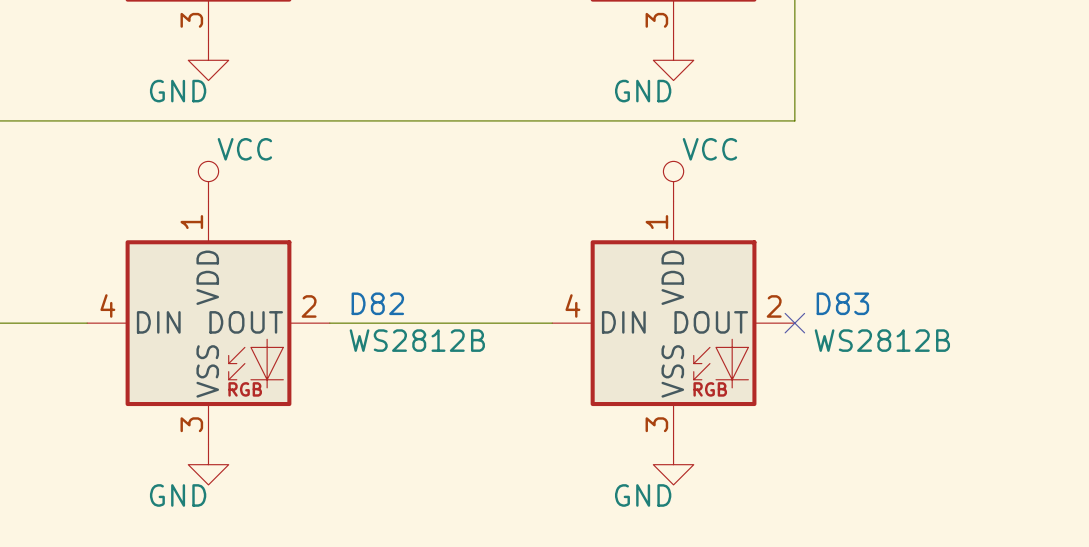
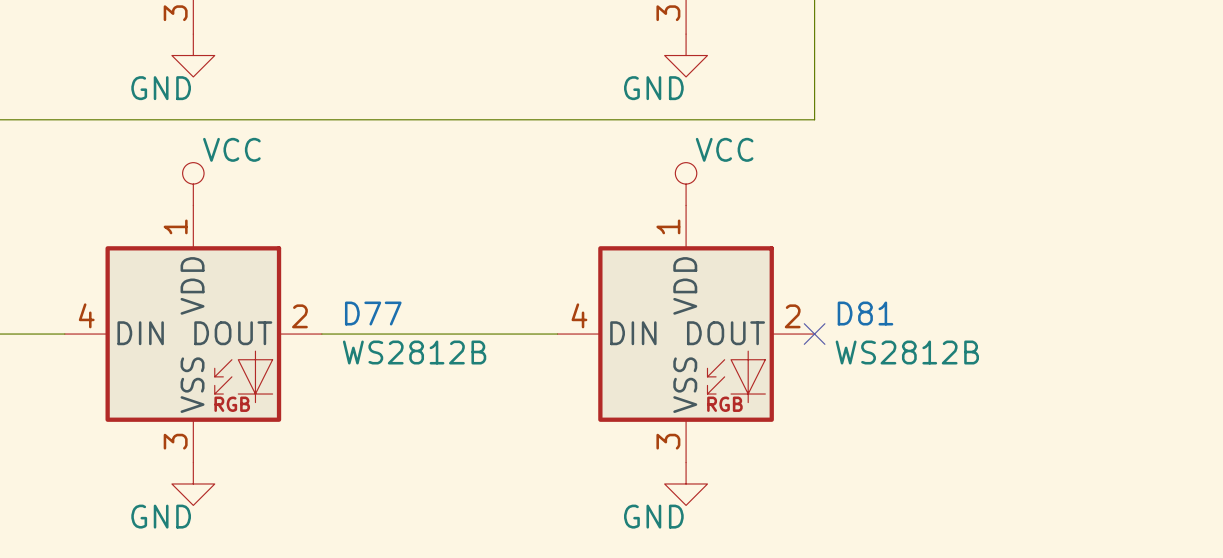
D82 name: D82 (377, 303) -> D77 (373, 313)
D83 name: D83 (842, 303) -> D81 (865, 313)

